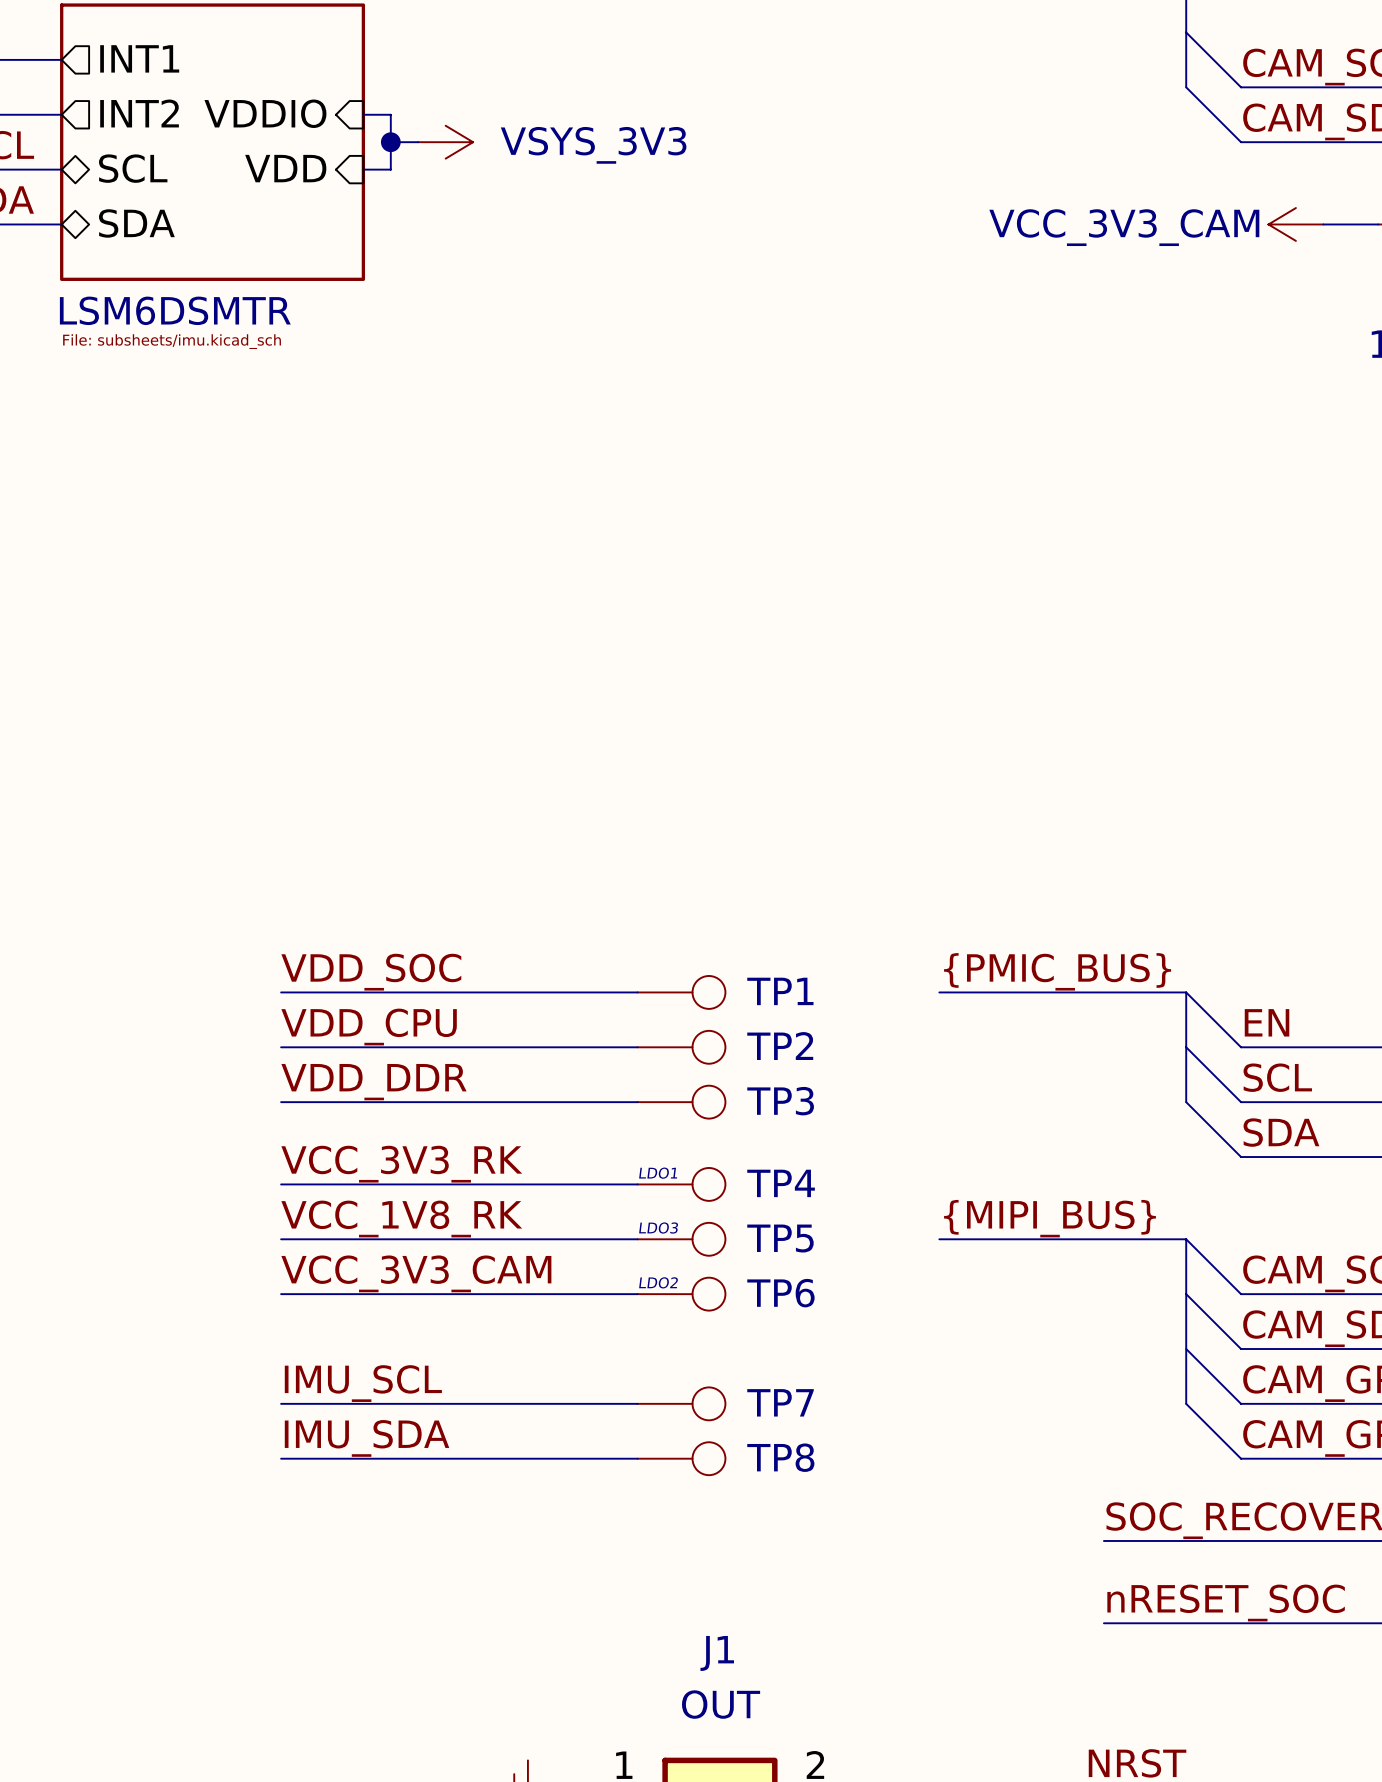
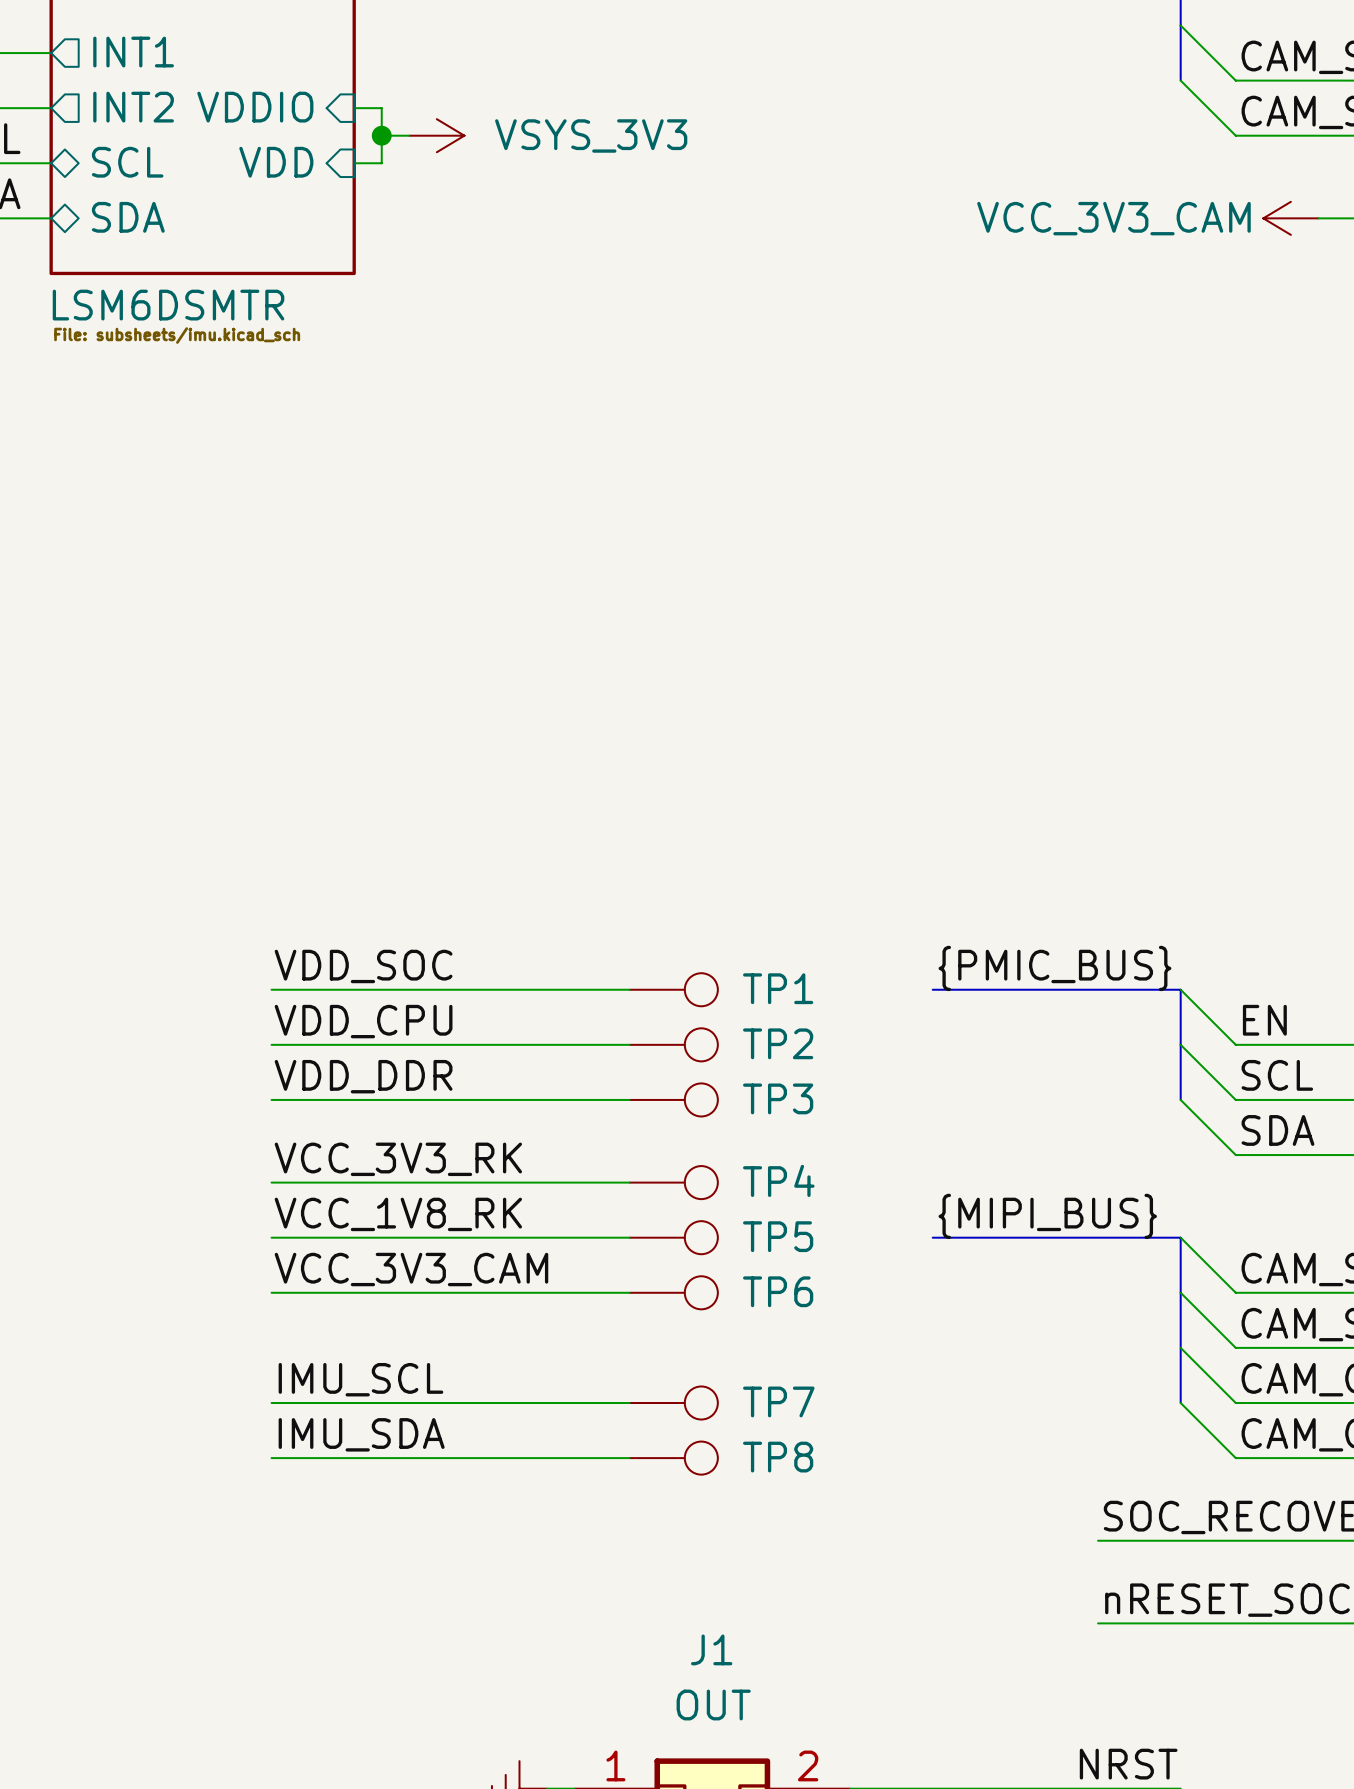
text: LDO1 (658, 1173) -> none
text: LDO3 (658, 1228) -> none
text: LDO2 (658, 1282) -> none

